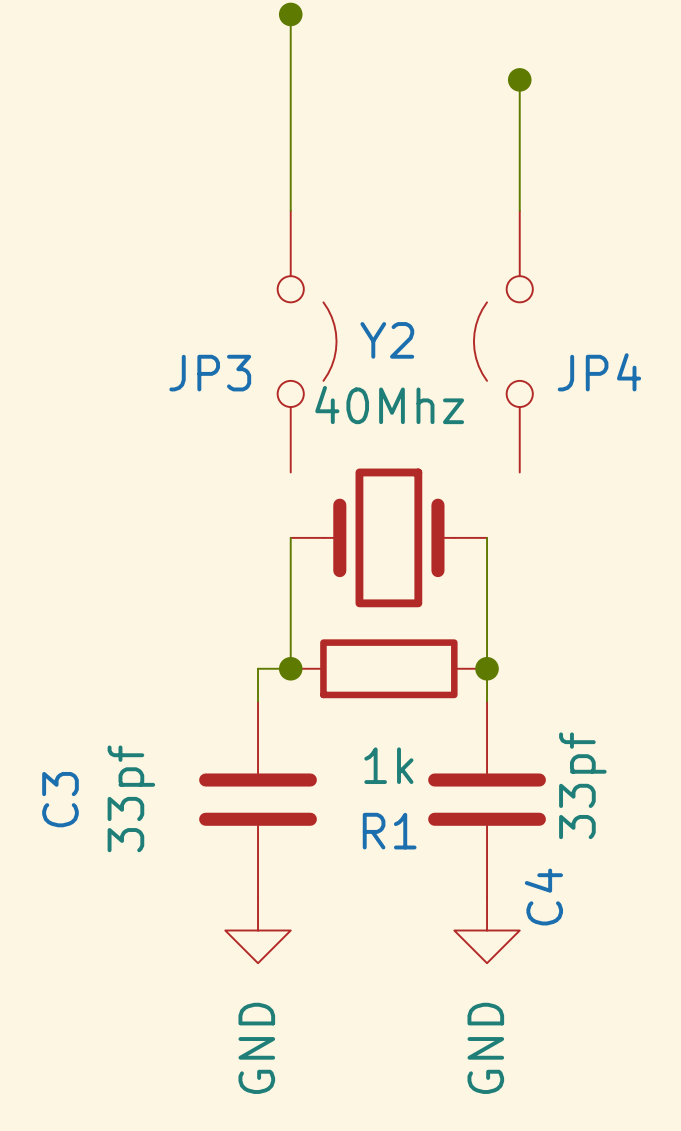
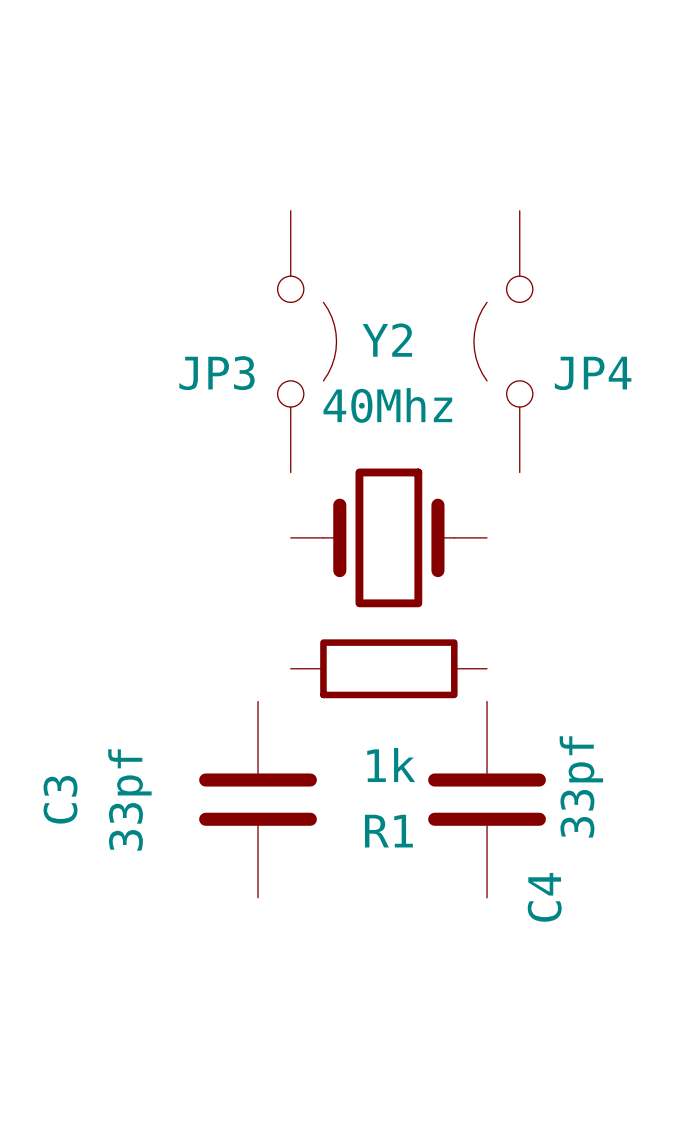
wire: (290, 14) (290, 210) -> none
junction: (290, 14) -> none
wire: (519, 79) (519, 210) -> none
junction: (519, 79) -> none
wire: (290, 537) (290, 668) (258, 668) (258, 701) -> none
wire: (487, 537) (487, 701) -> none
junction: (290, 668) -> none
junction: (487, 668) -> none
power symbol: GND (258, 930) -> none
power symbol: GND (487, 930) -> none

